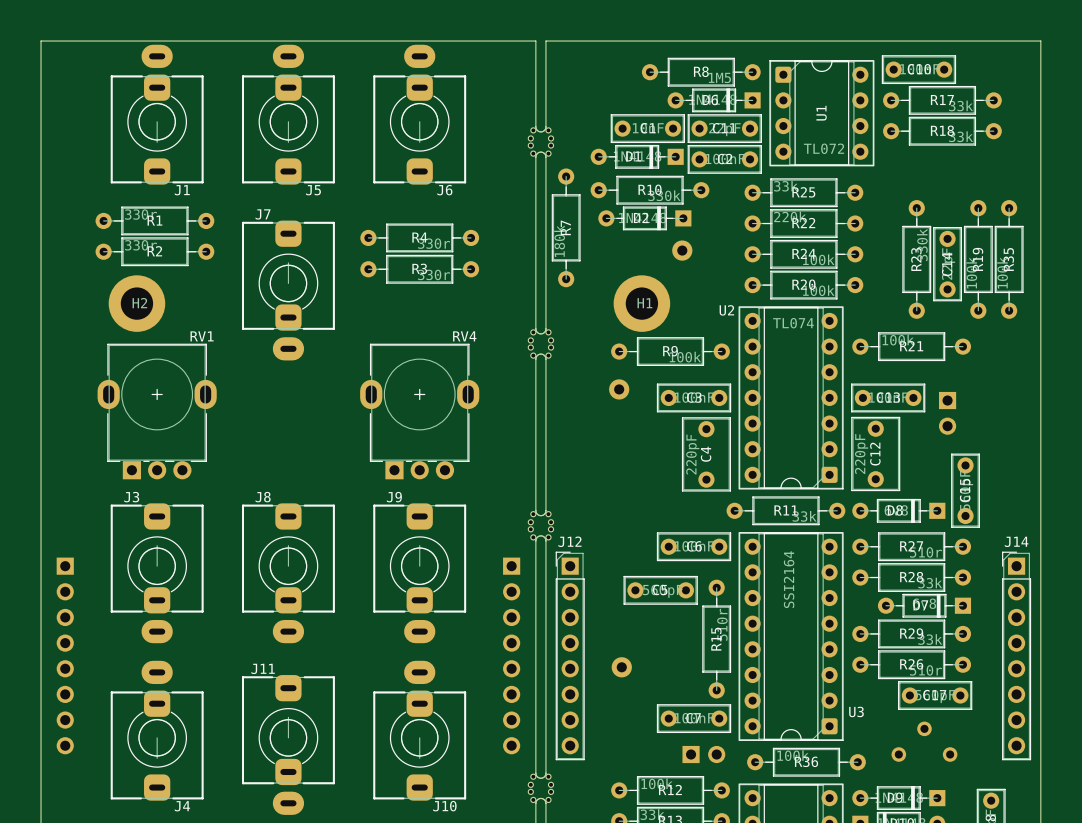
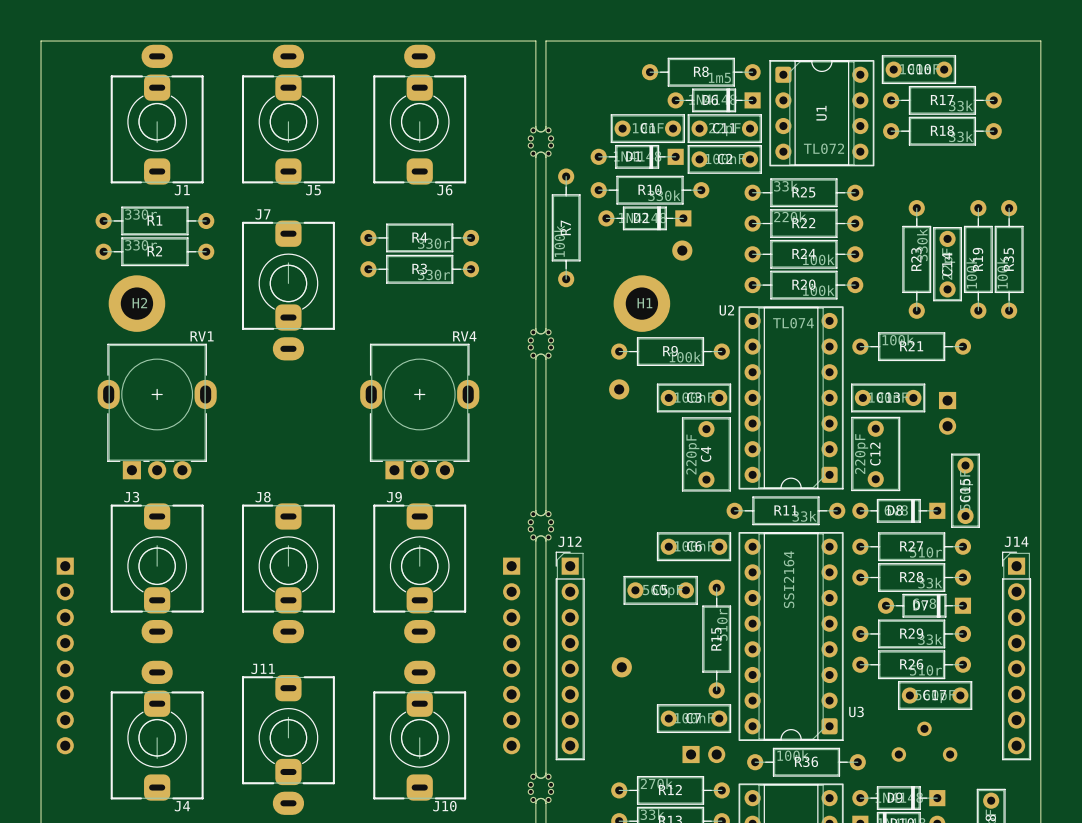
R8 value: 1M5 (719, 77) -> 1m5 (719, 77)
R7 value: 180k (559, 241) -> 100k (559, 241)
R12 value: 100k (657, 783) -> 270k (656, 783)

